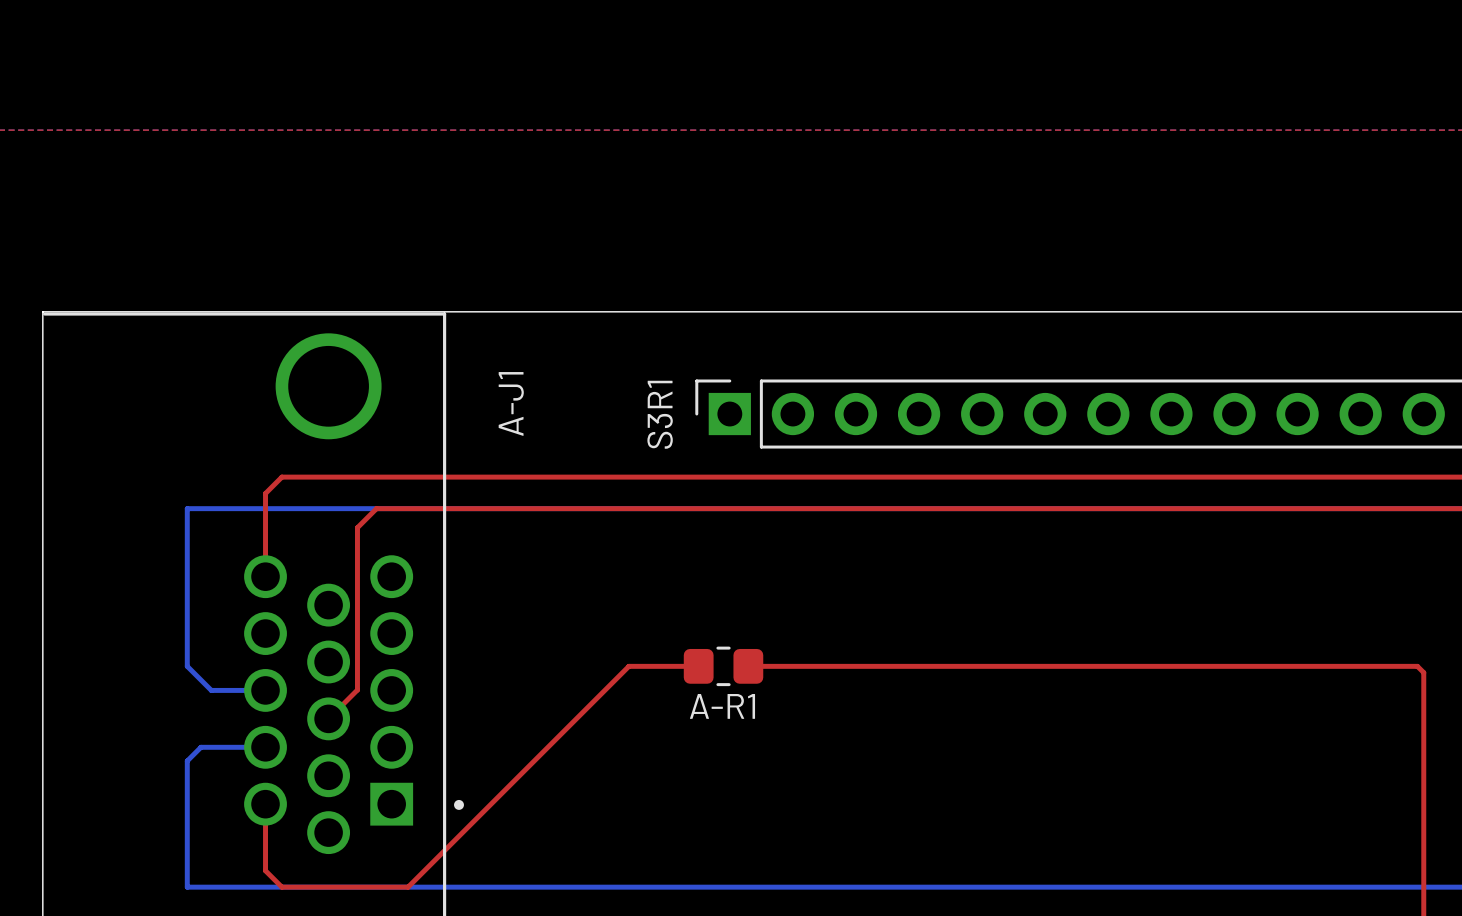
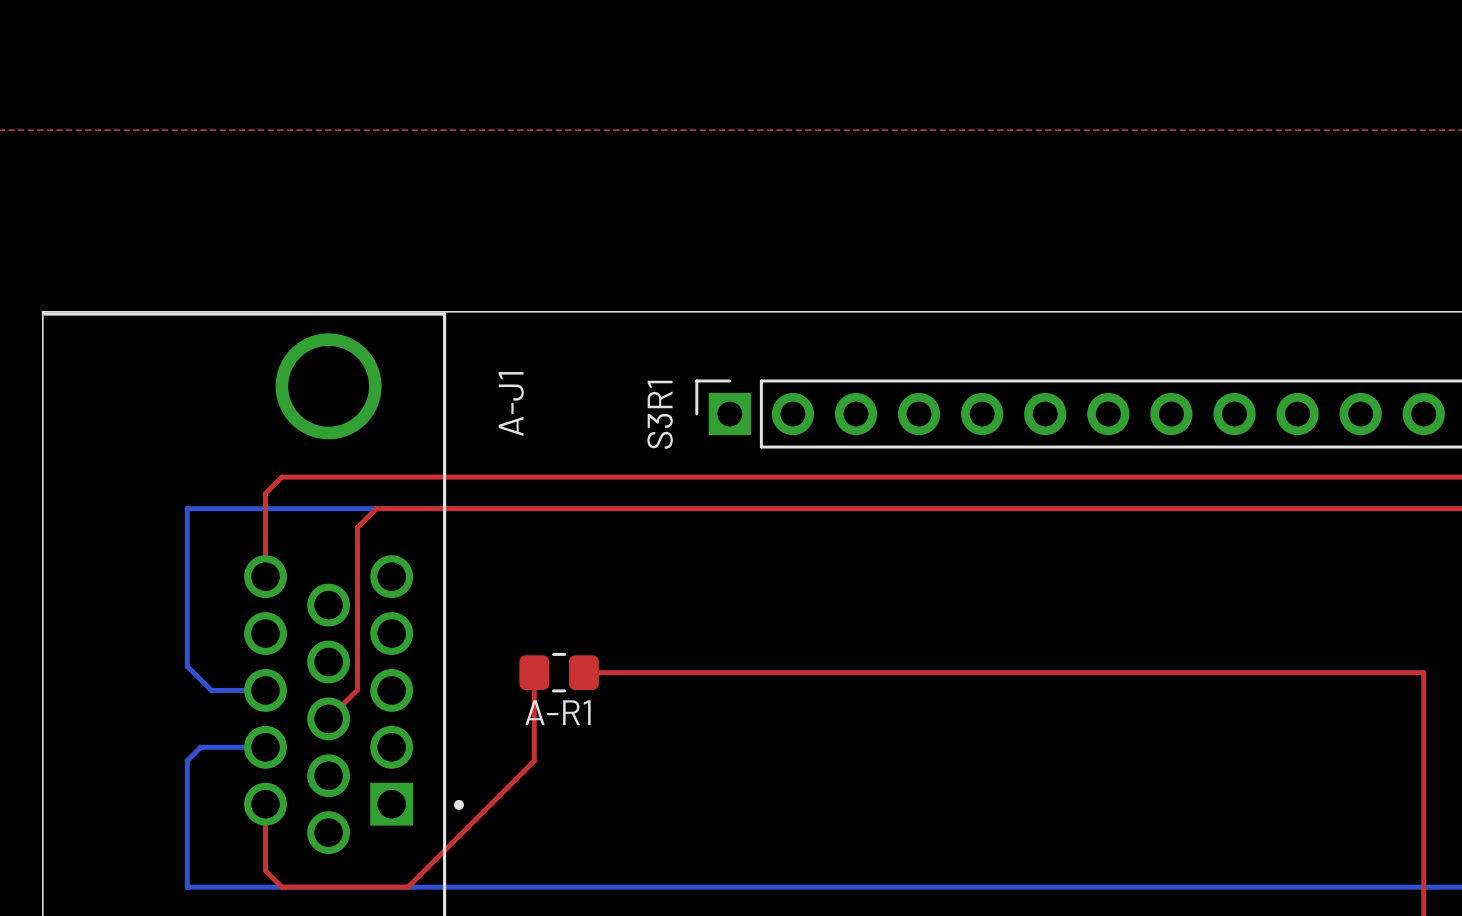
top track: (698, 666) (628, 666) (534, 760) -> (534, 672) (534, 760)
A-R1 position: (723, 666) -> (559, 672)
top track: (748, 666) (1417, 666) (1423, 672) -> (583, 672) (1423, 672)

